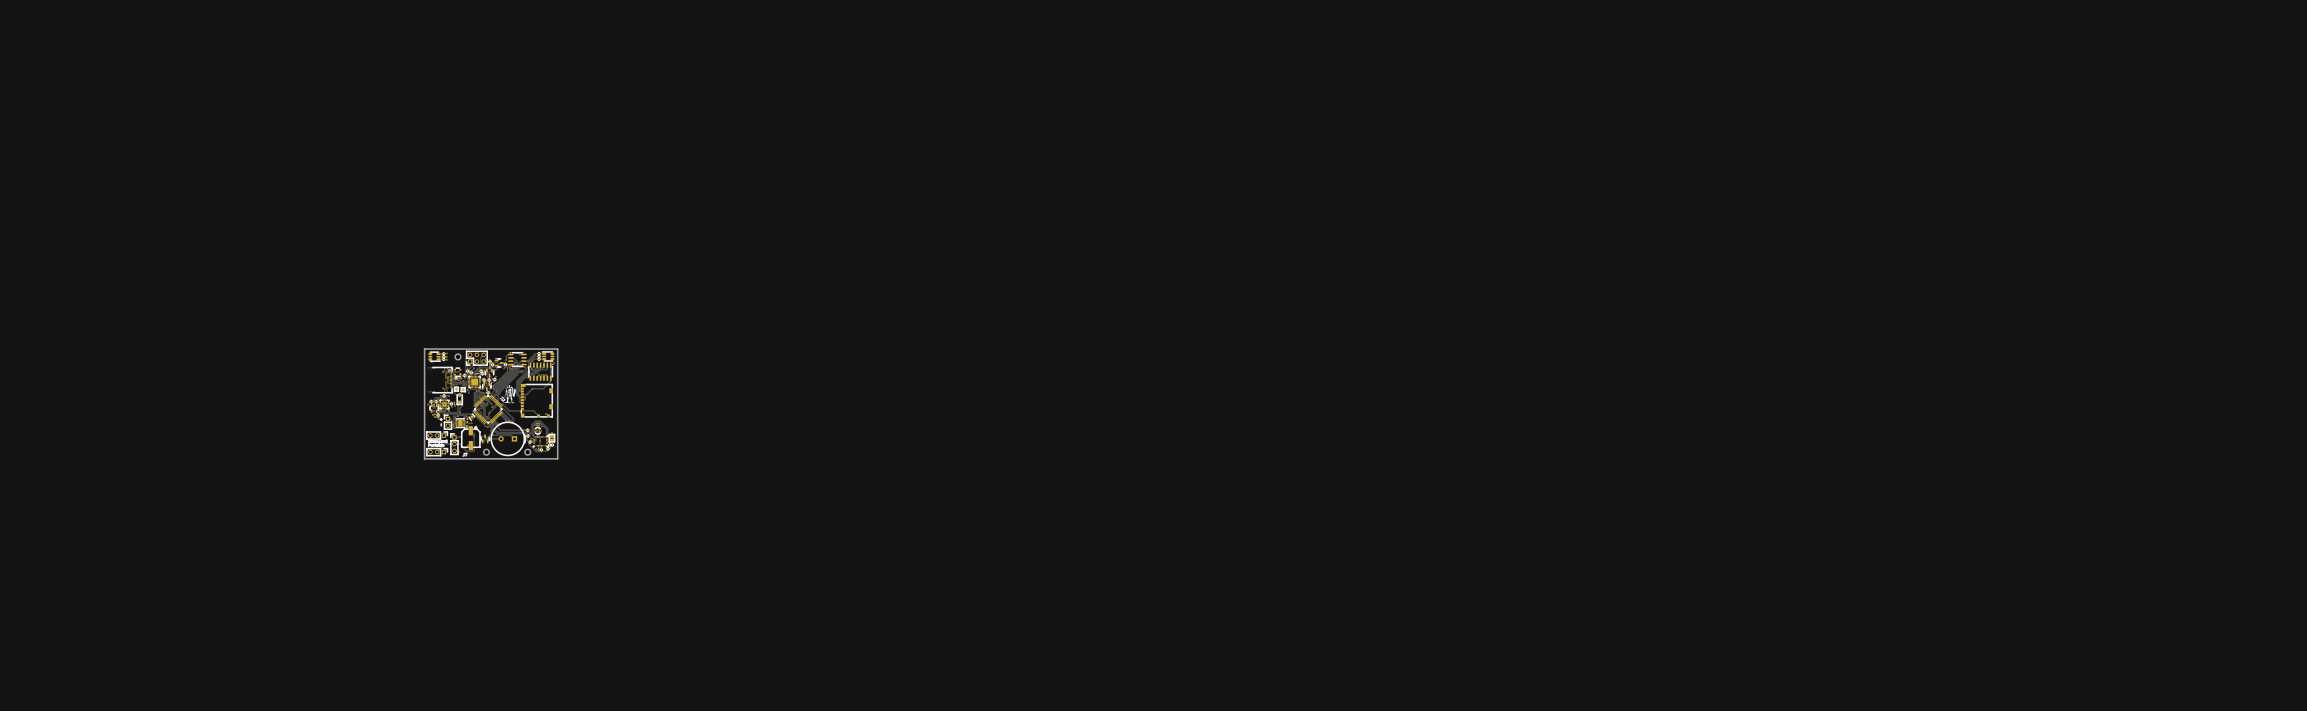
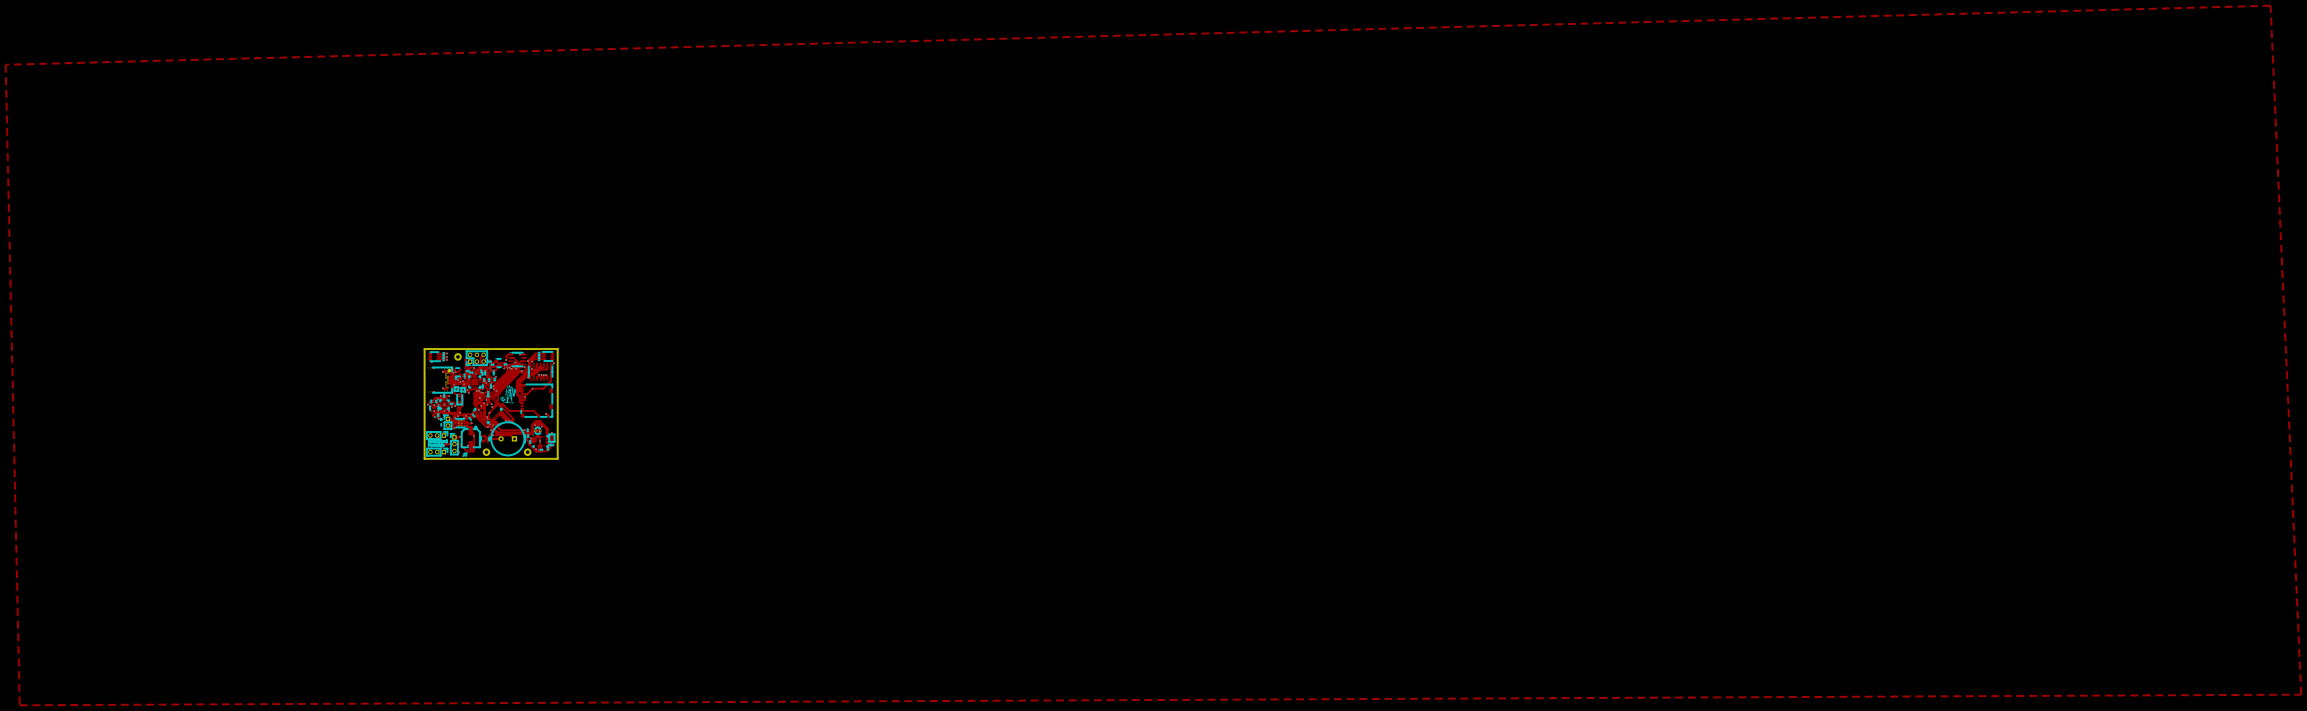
zone outline: none -> (2270, 5) (2301, 694) (19, 705) (5, 64) (2270, 5)

